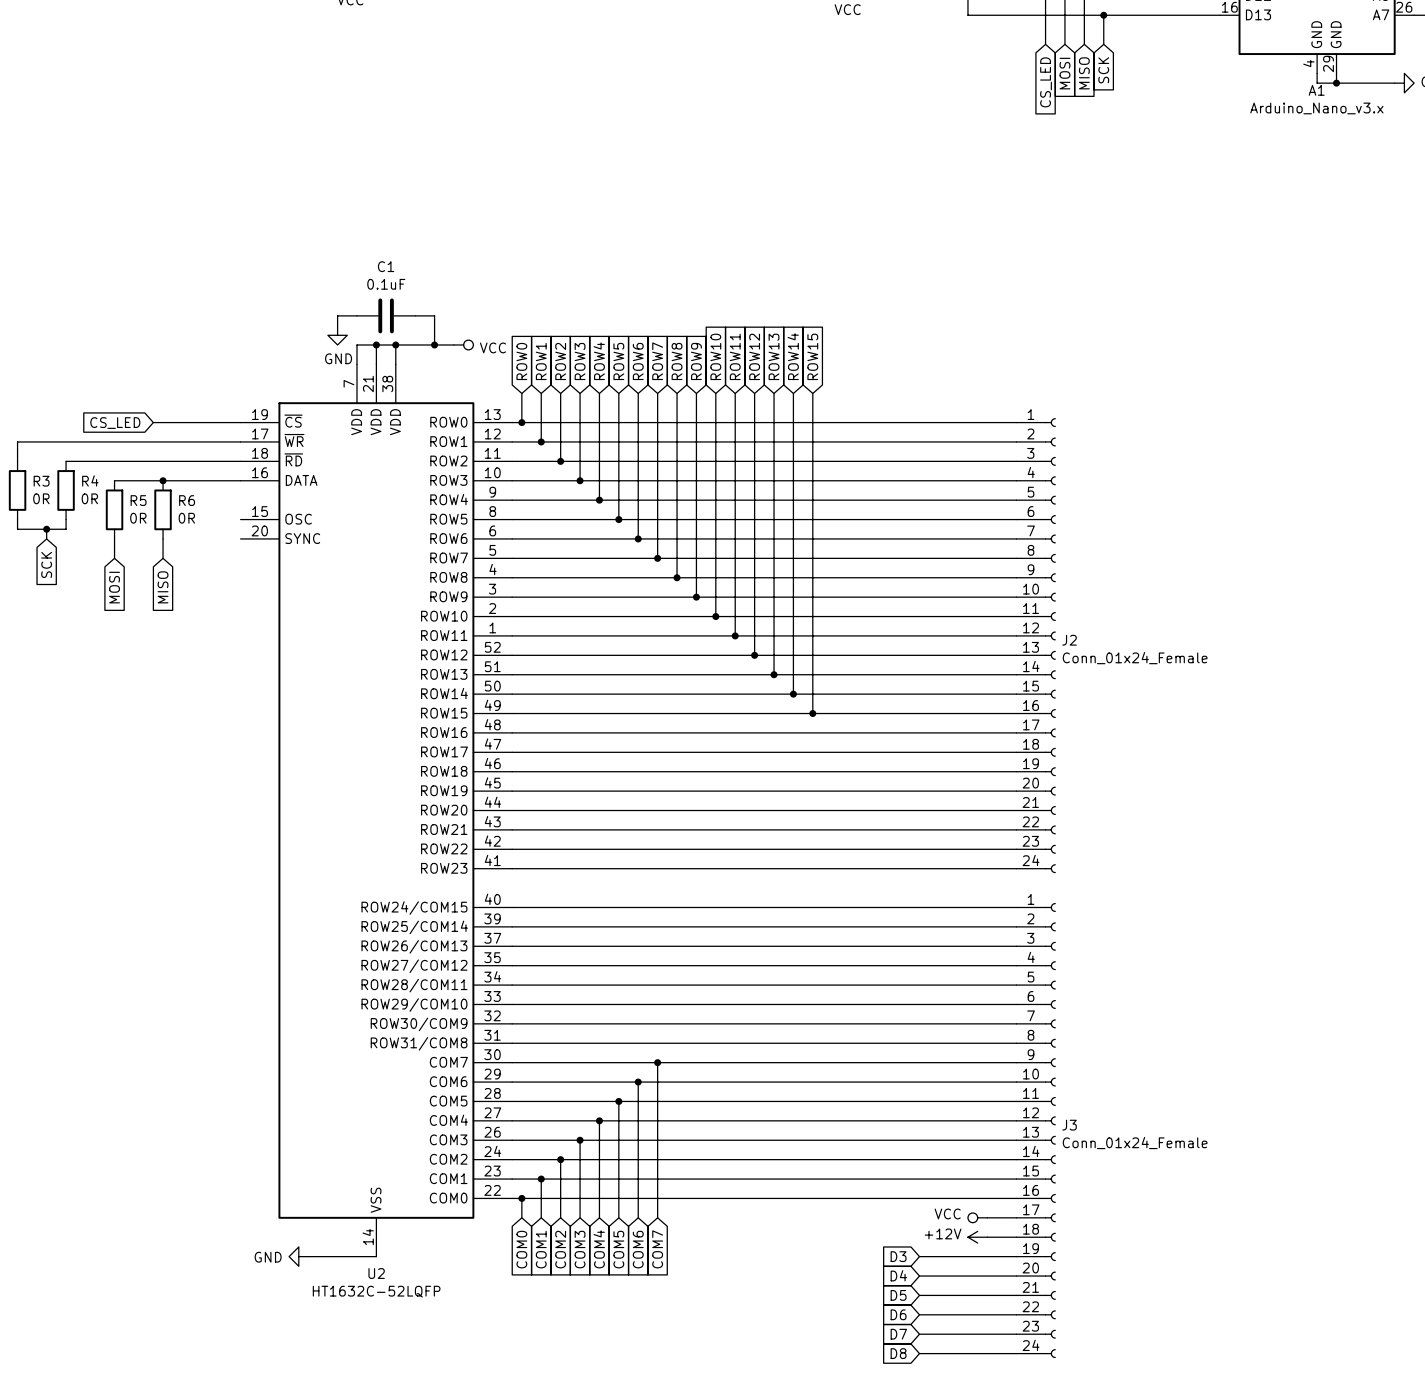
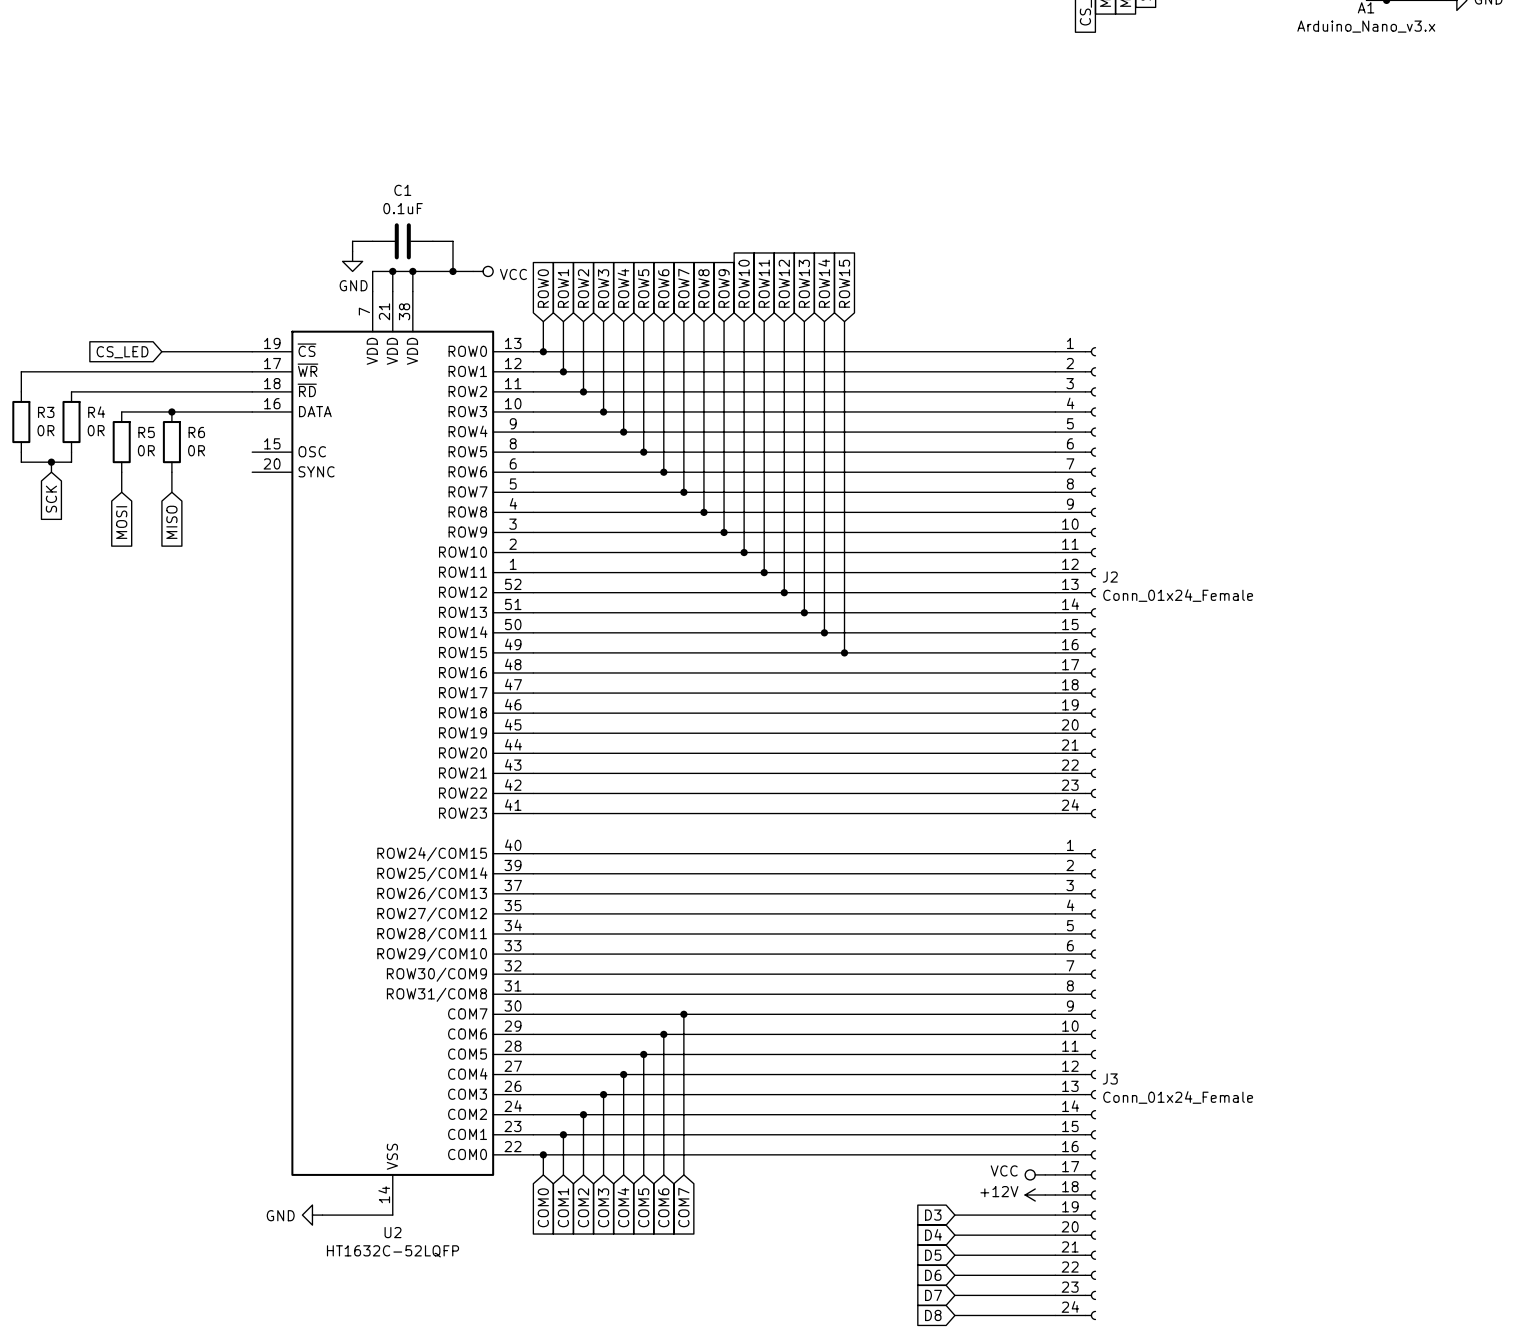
power symbol position: VCC (977, 1217) -> VCC (1035, 1174)
power symbol position: +12V (977, 1237) -> +12V (1035, 1195)

